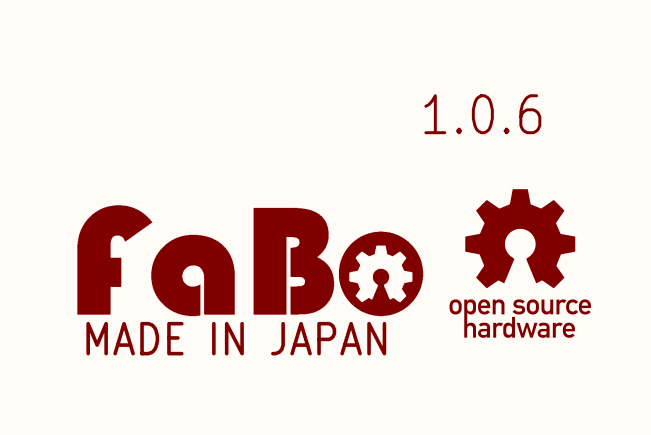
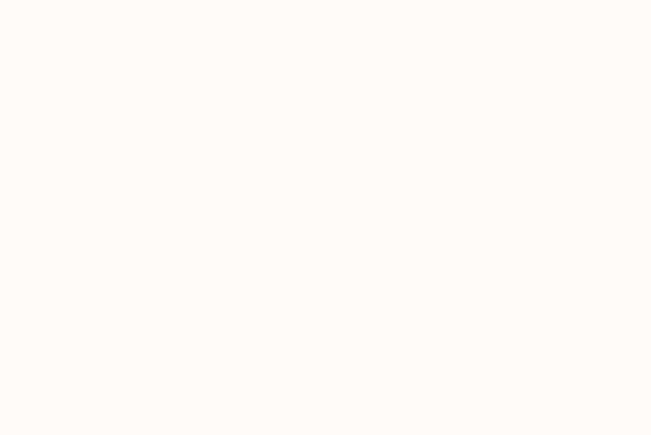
text: 1.0.6 (482, 114) -> none
part: (250, 260) -> none
part: (520, 263) -> none

